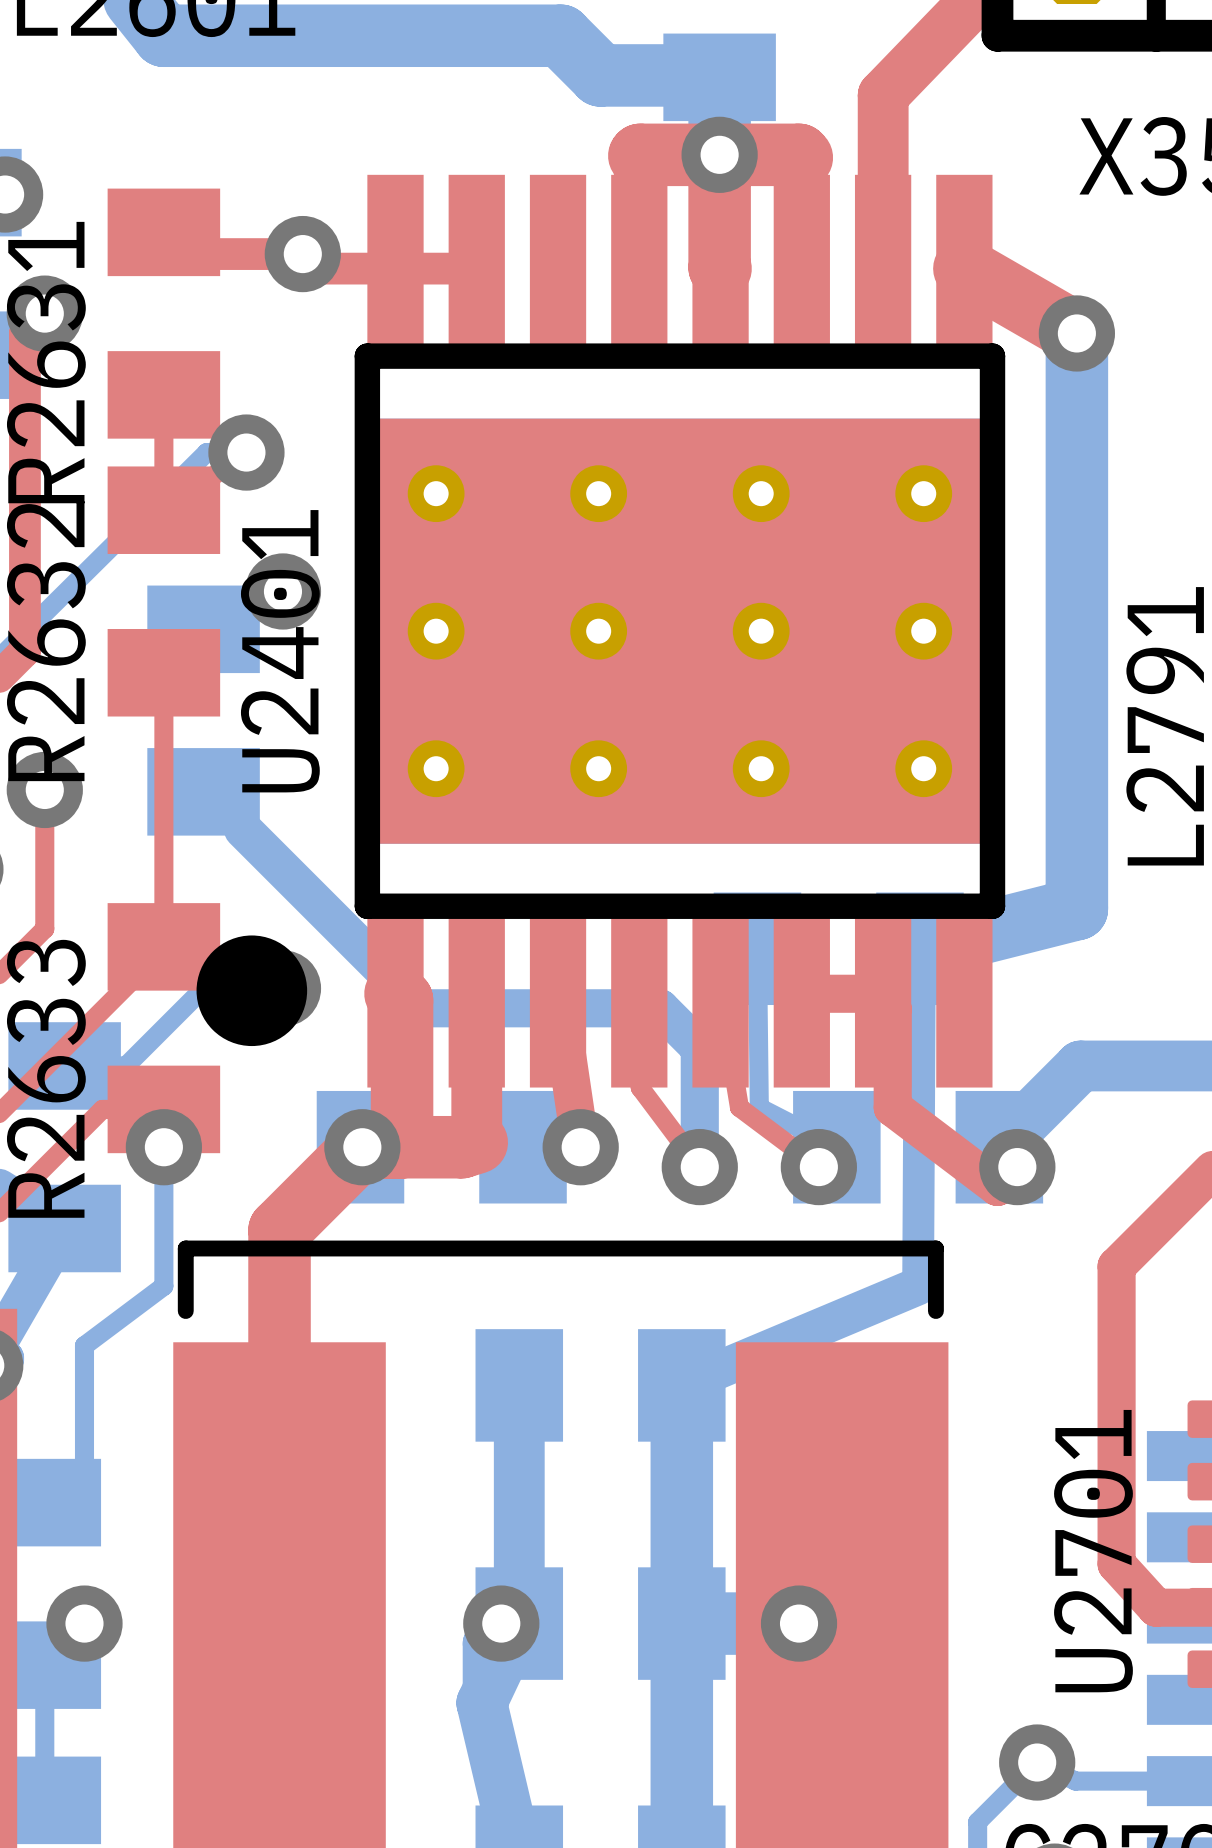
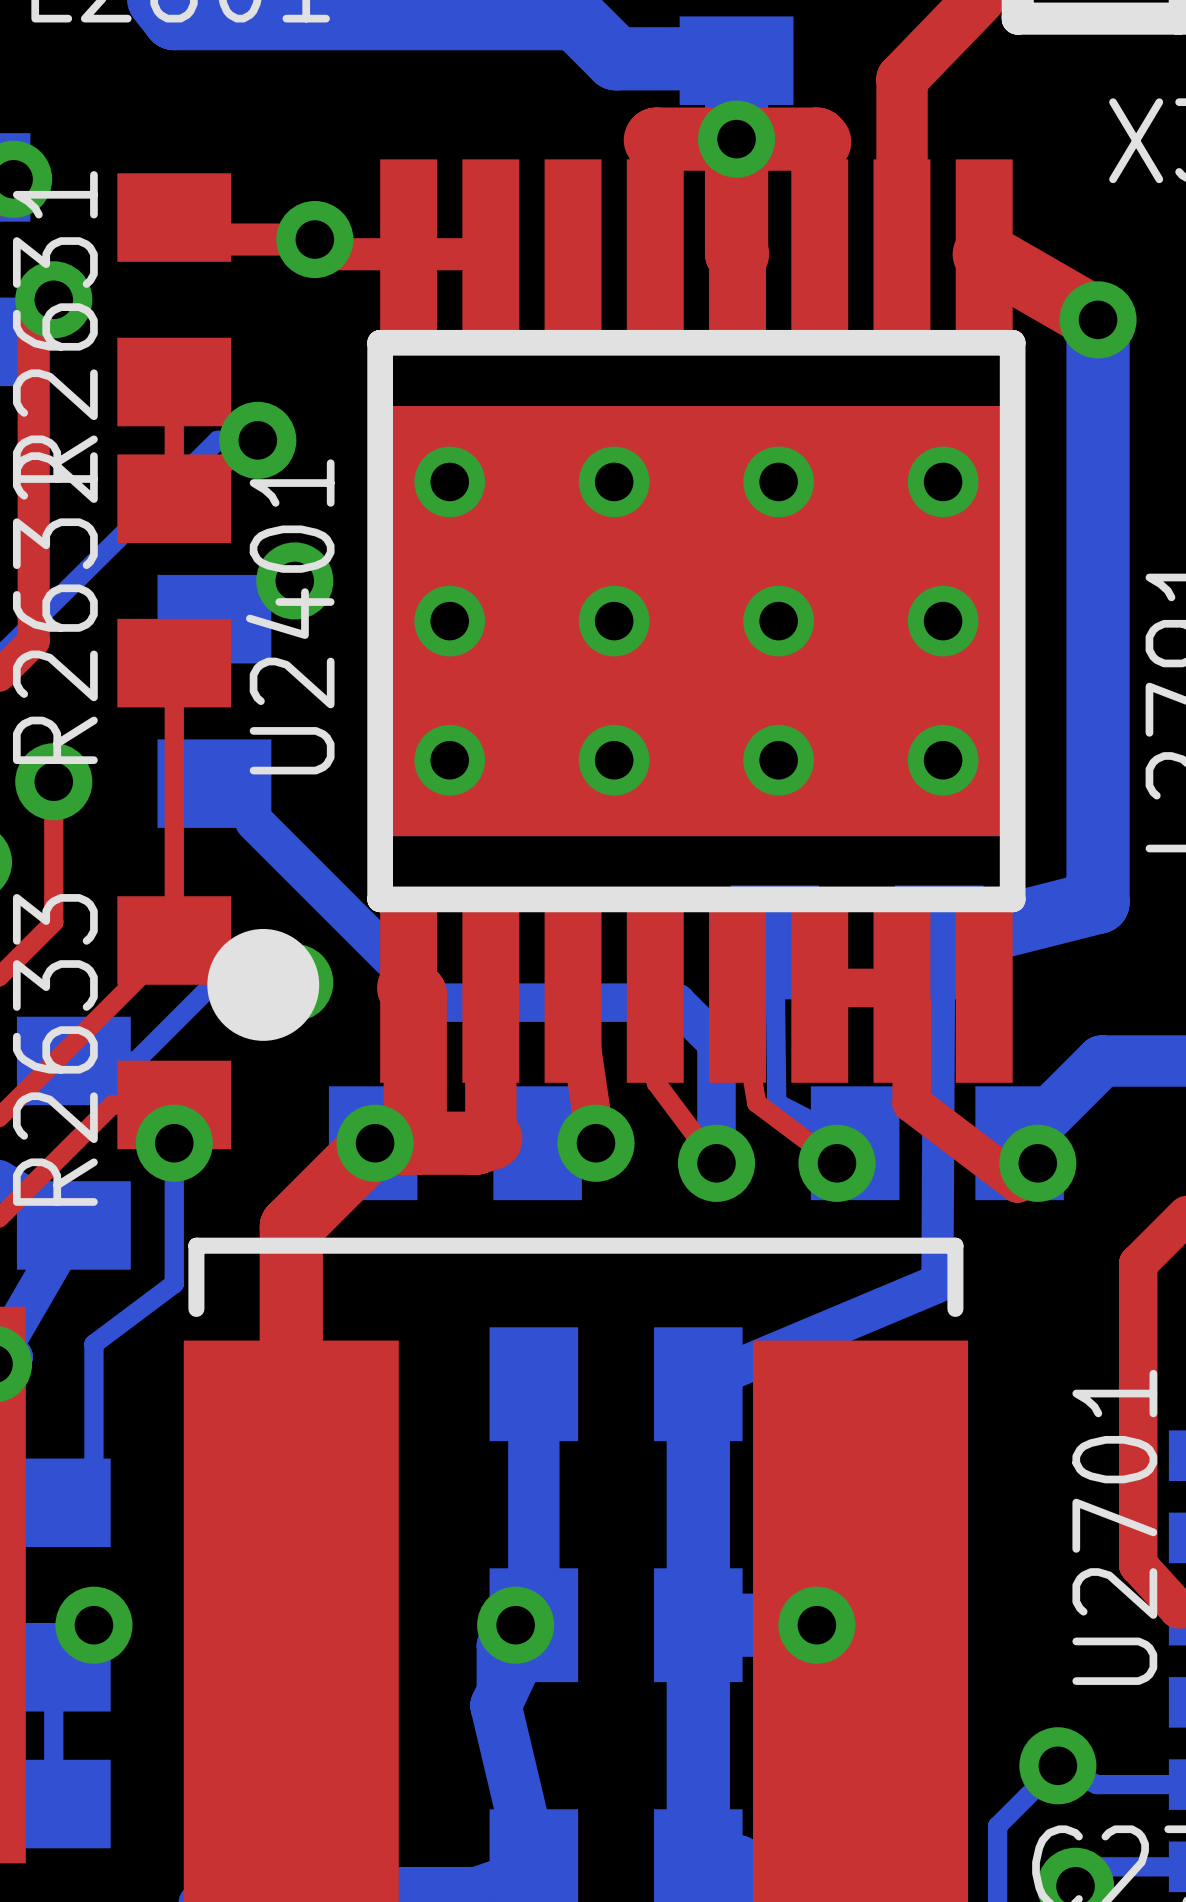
U2401 footprint: [196, 174, 1006, 1088] -> [207, 159, 1026, 1083]

